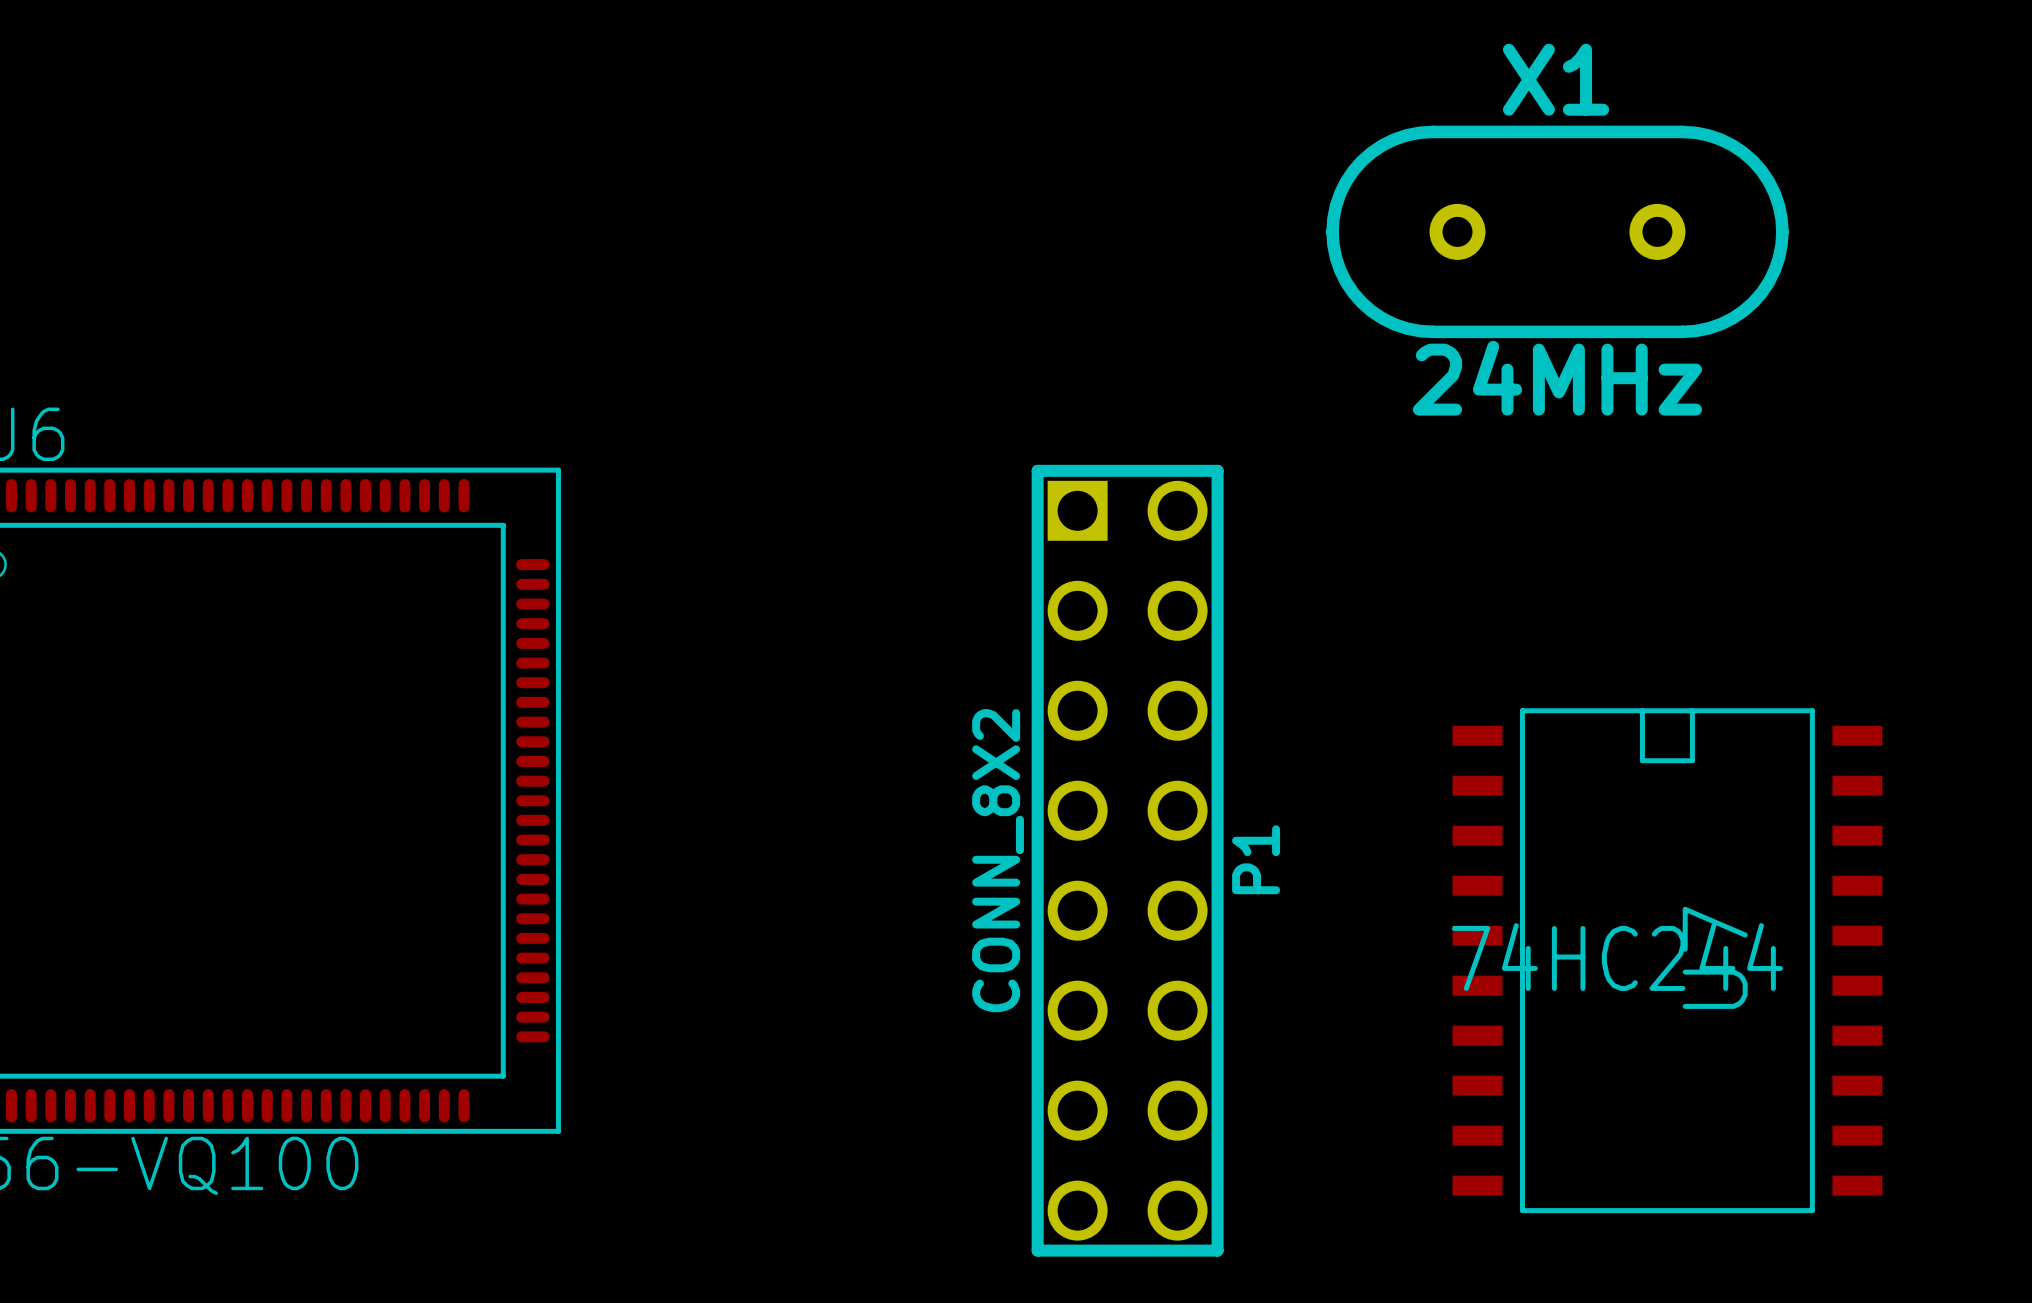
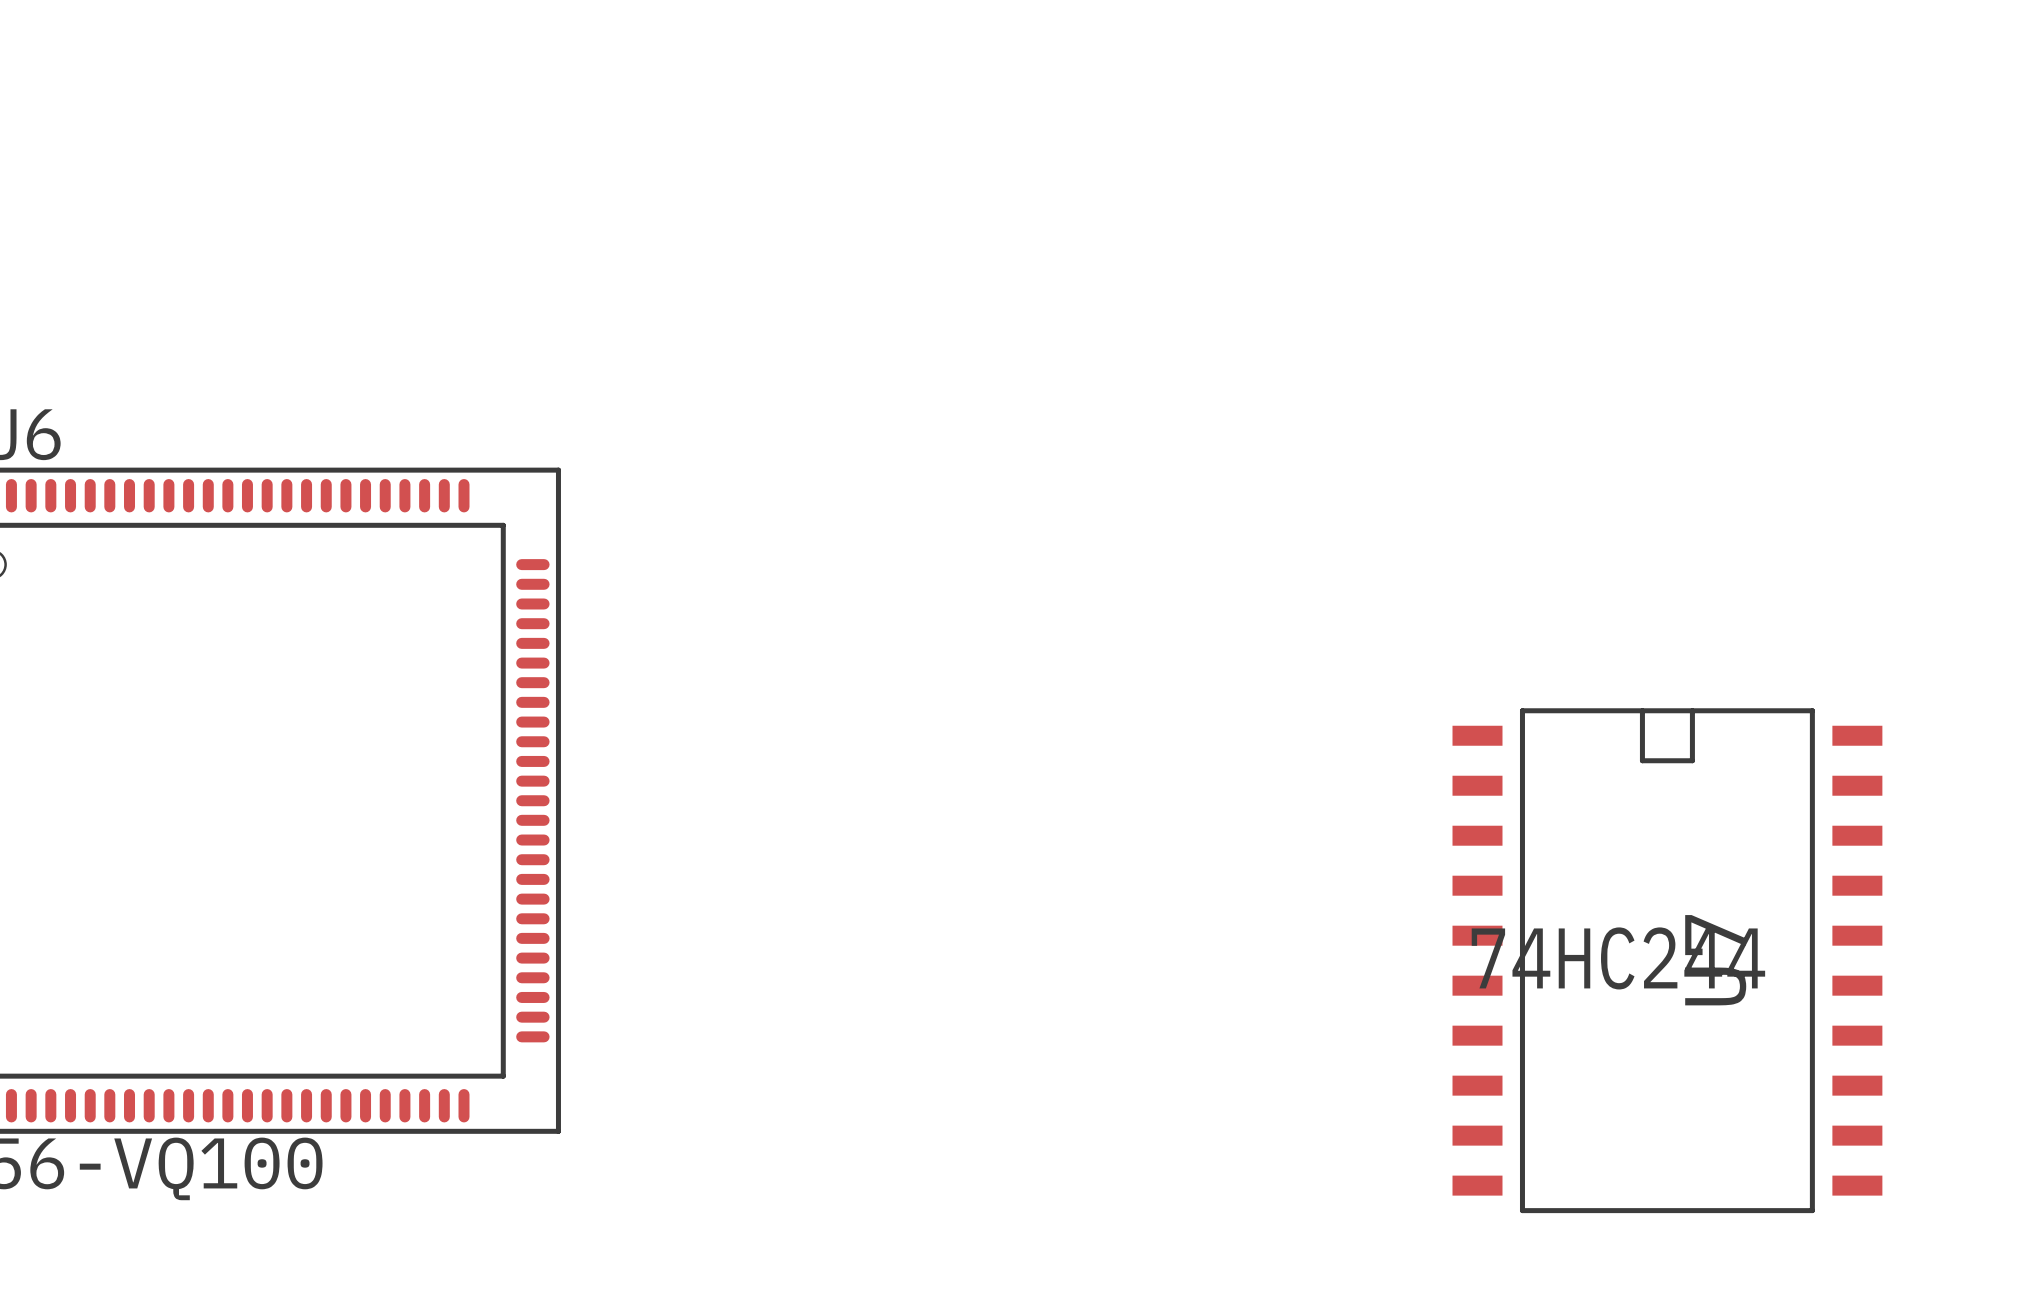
X1: 24MHz (1557, 231) -> none
P1: CONN_8X2 (1127, 860) -> none

